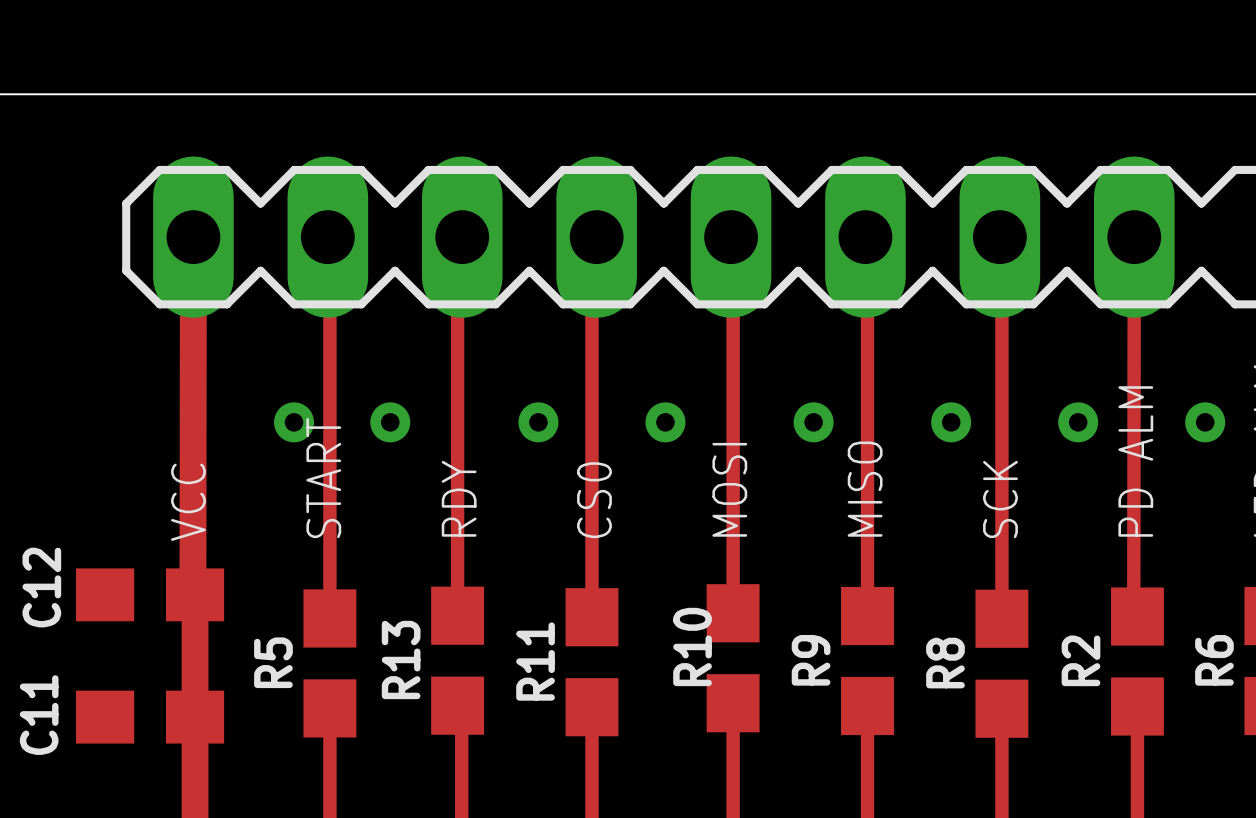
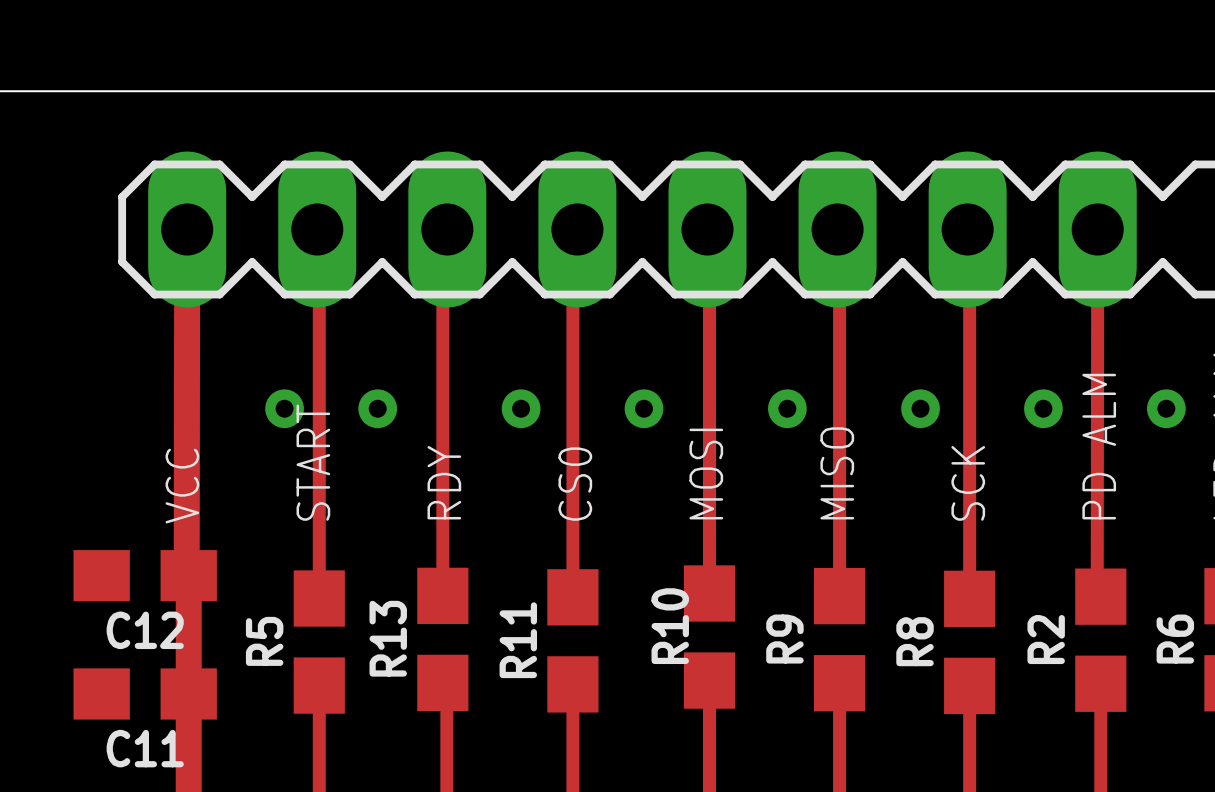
C12 name rotation: 0° (41, 587) -> 90° clockwise (145, 630)
C12 name position: C12 (41, 587) -> C12 (145, 630)
C11 name rotation: 0° (39, 715) -> 90° clockwise (145, 748)
C11 name position: C11 (39, 715) -> C11 (145, 748)

